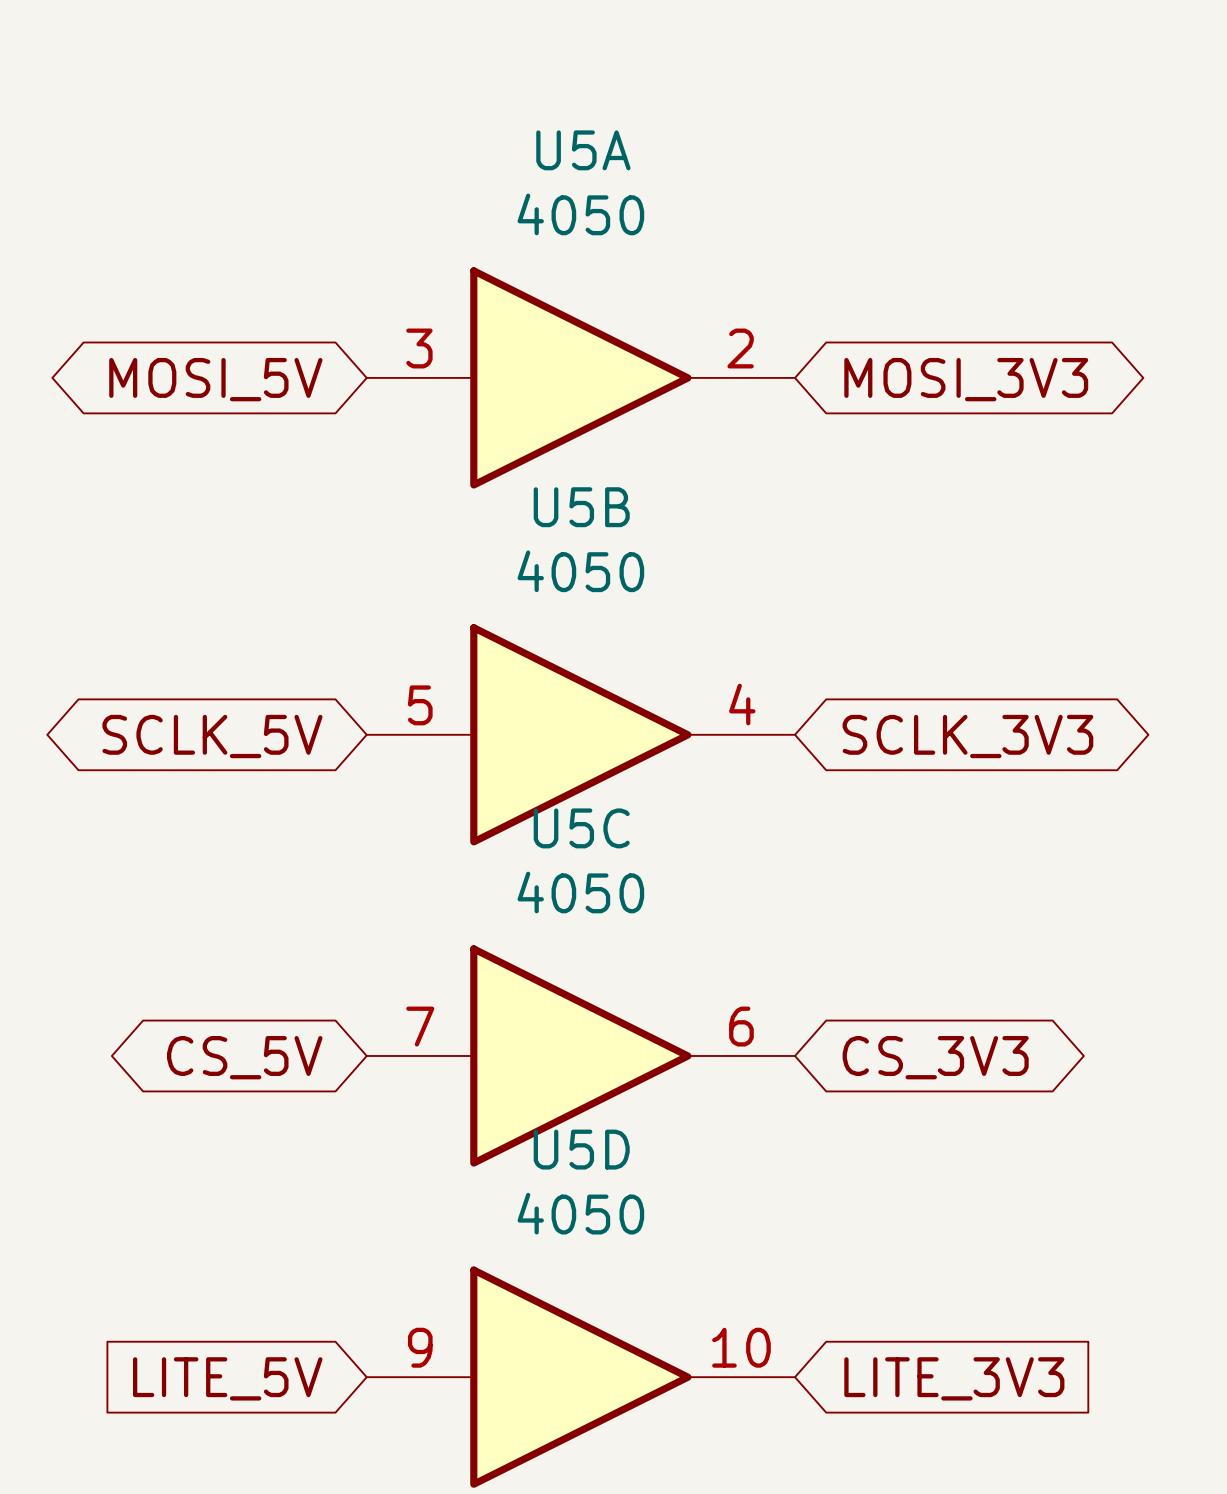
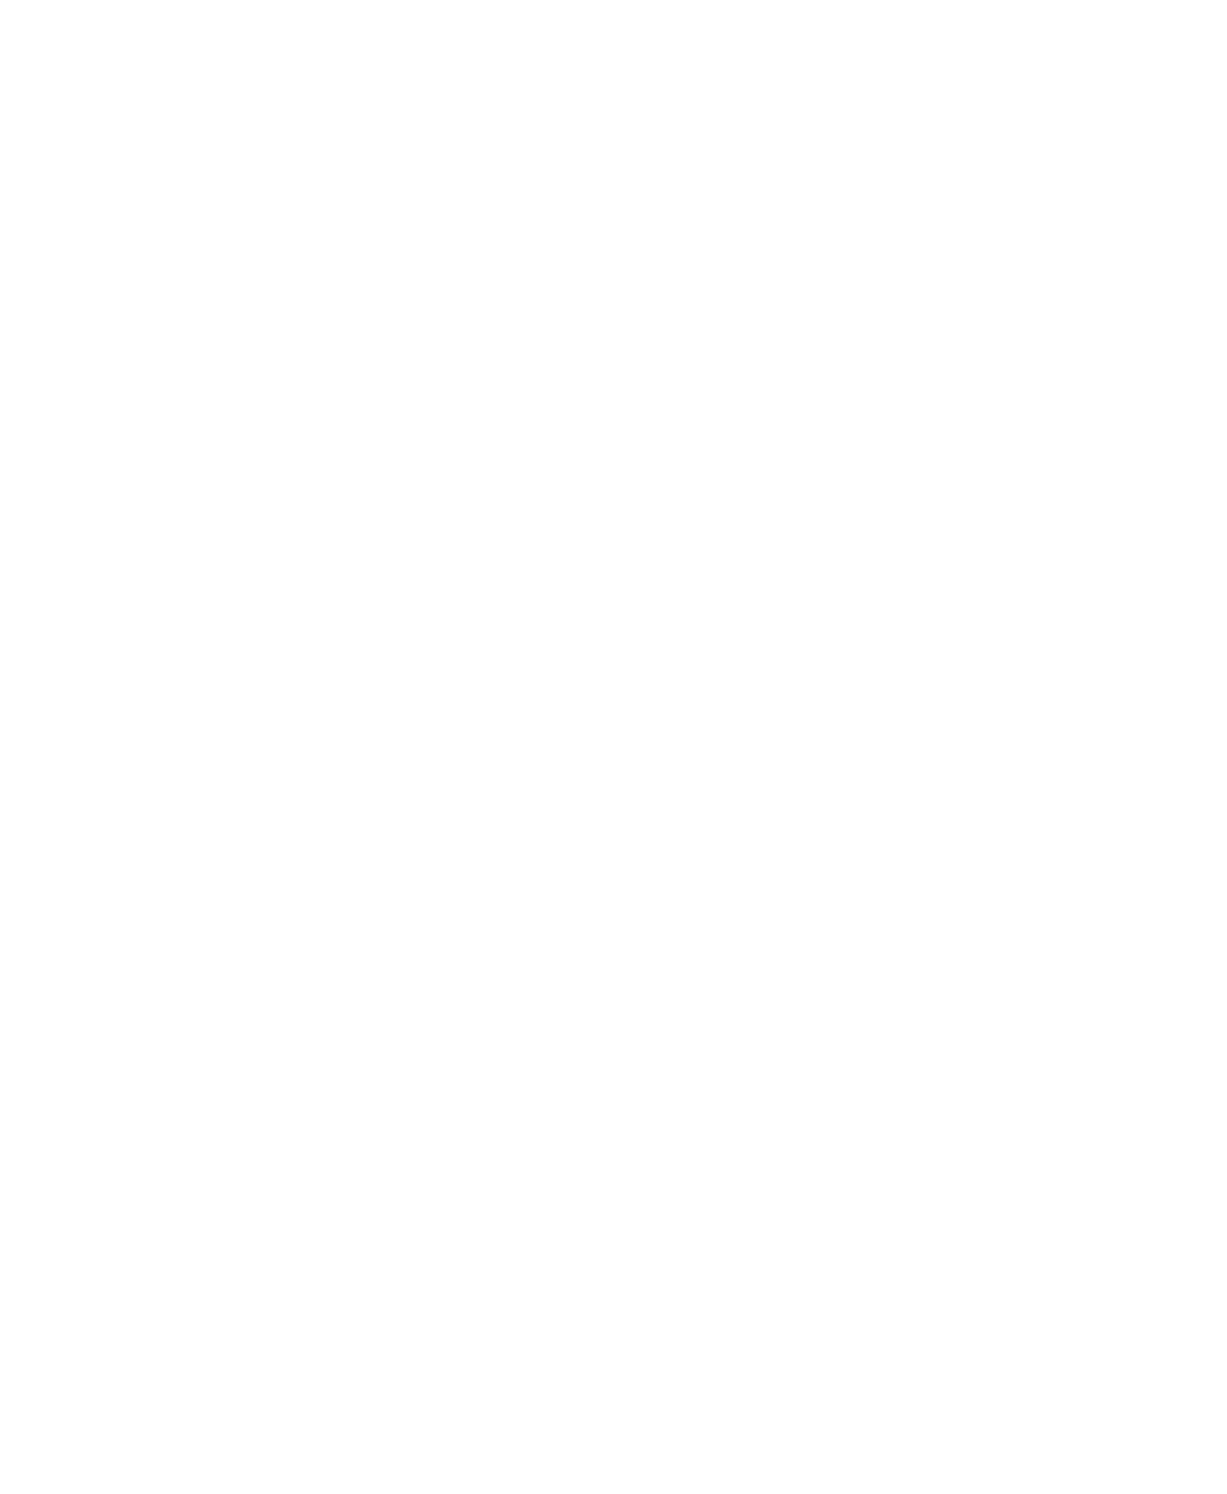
U5A: 4050 (580, 377) -> none
global label: MOSI_5V (215, 379) -> none
global label: MOSI_3V3 (966, 379) -> none
U5B: 4050 (580, 734) -> none
global label: SCLK_5V (212, 736) -> none
global label: SCLK_3V3 (967, 736) -> none
U5C: 4050 (580, 1055) -> none
global label: CS_5V (244, 1057) -> none
global label: CS_3V3 (935, 1057) -> none
U5D: 4050 (580, 1377) -> none
global label: LITE_5V (227, 1378) -> none
global label: LITE_3V3 (954, 1378) -> none

